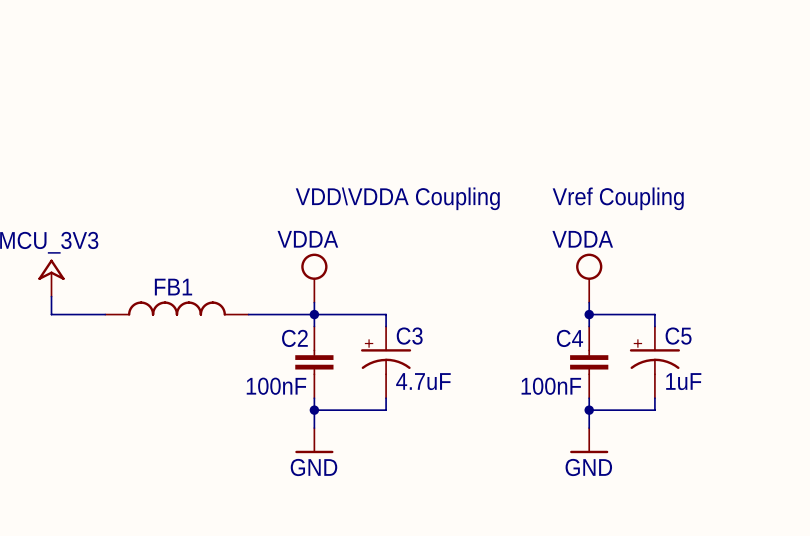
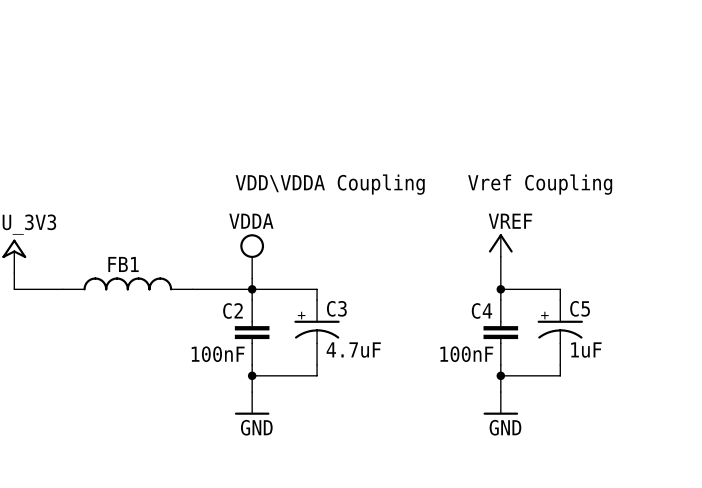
power symbol: none -> VREF (500, 245)
power symbol: VDDA (589, 278) -> none

